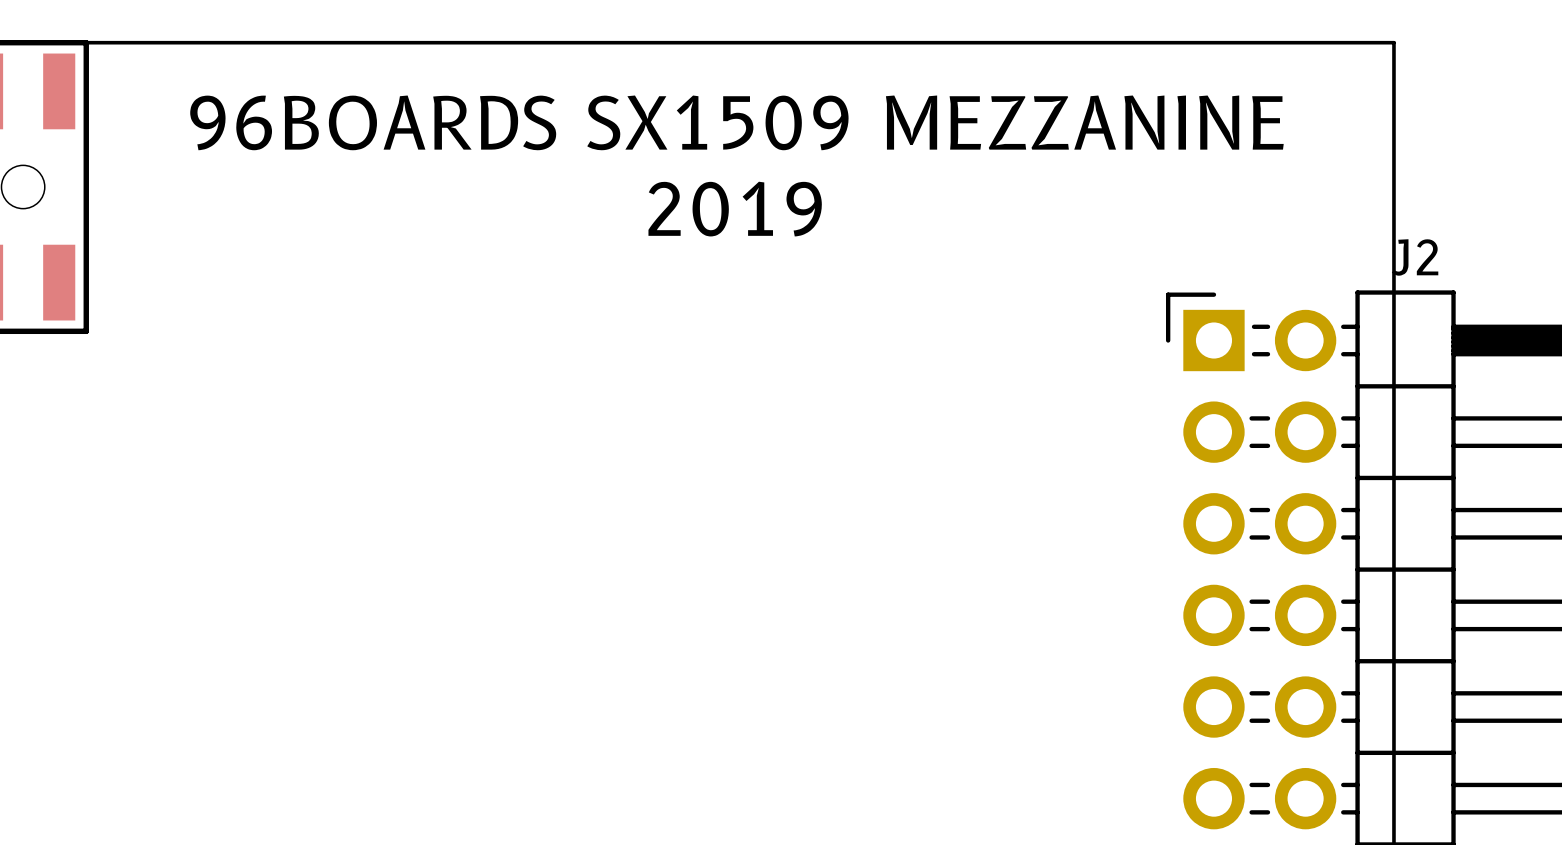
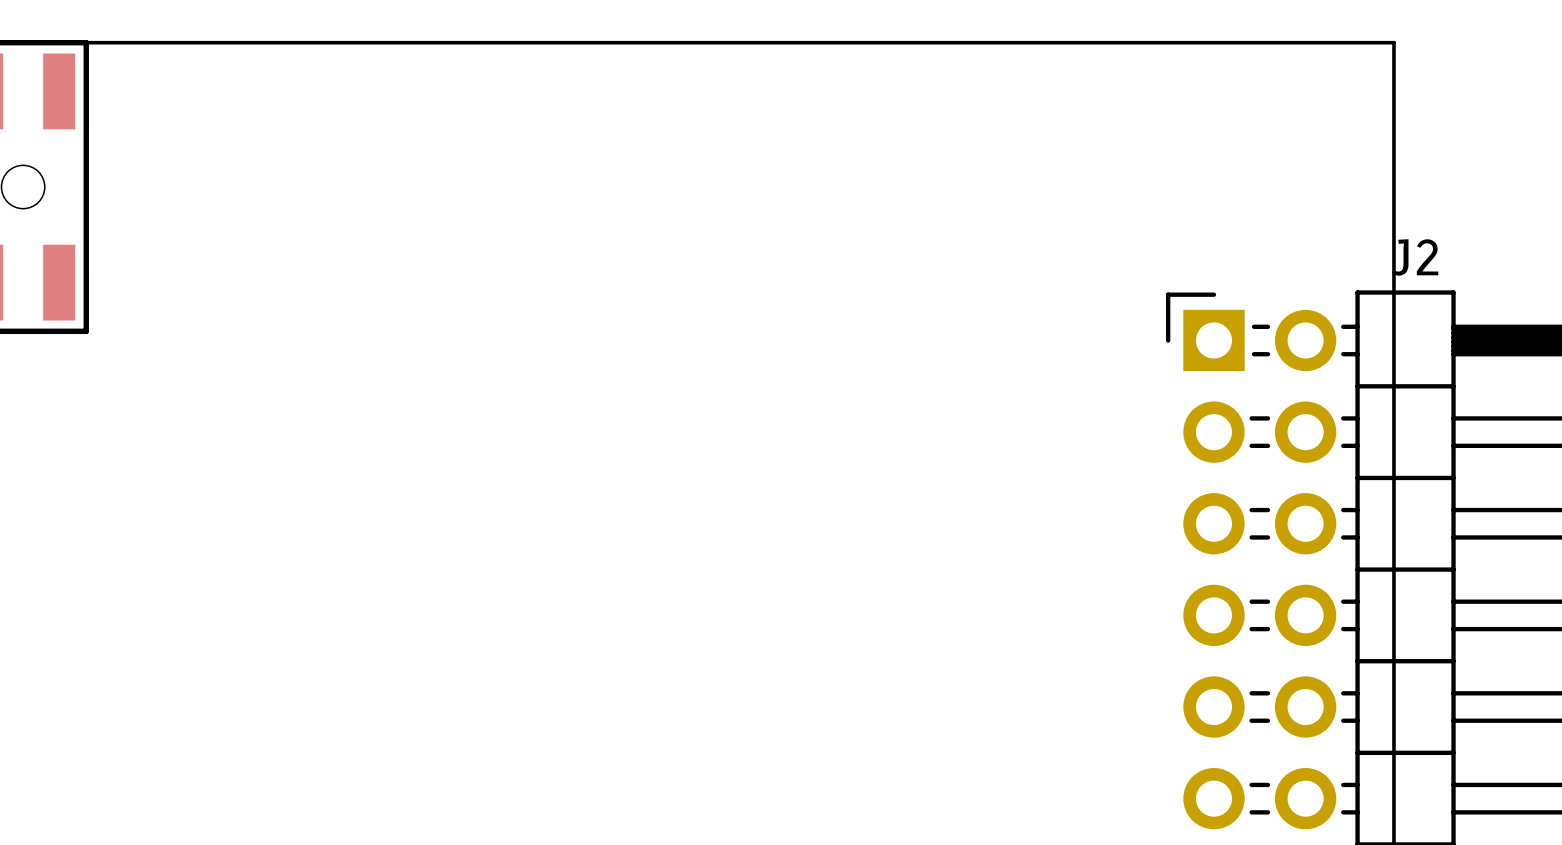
text: 96BOARDS SX1509 MEZZANINE (736, 122) -> none
text: 2019 (735, 209) -> none

